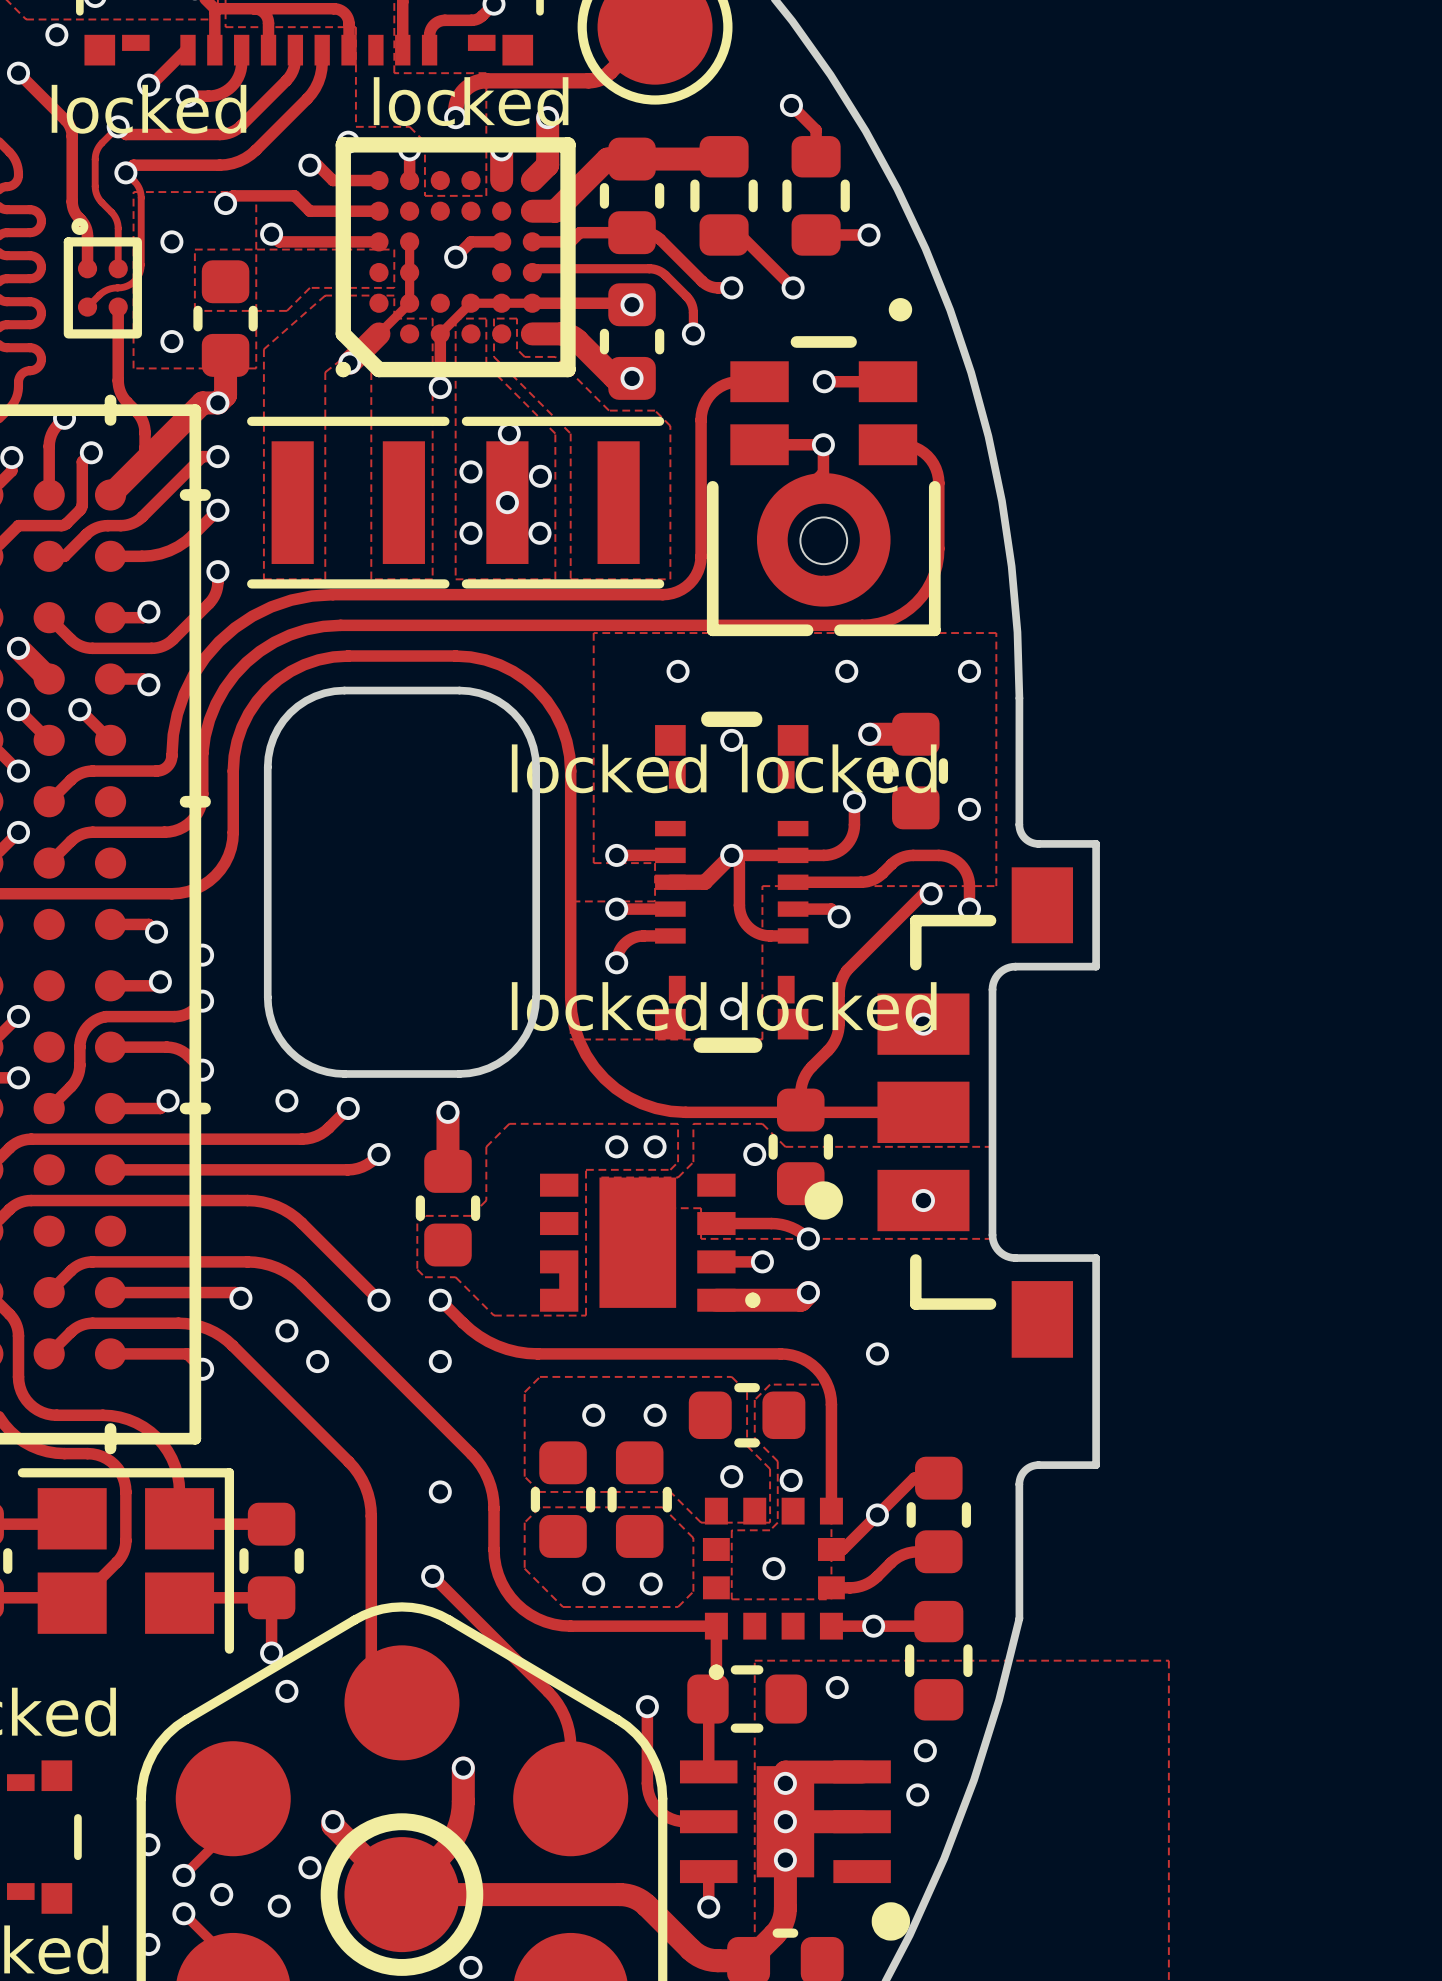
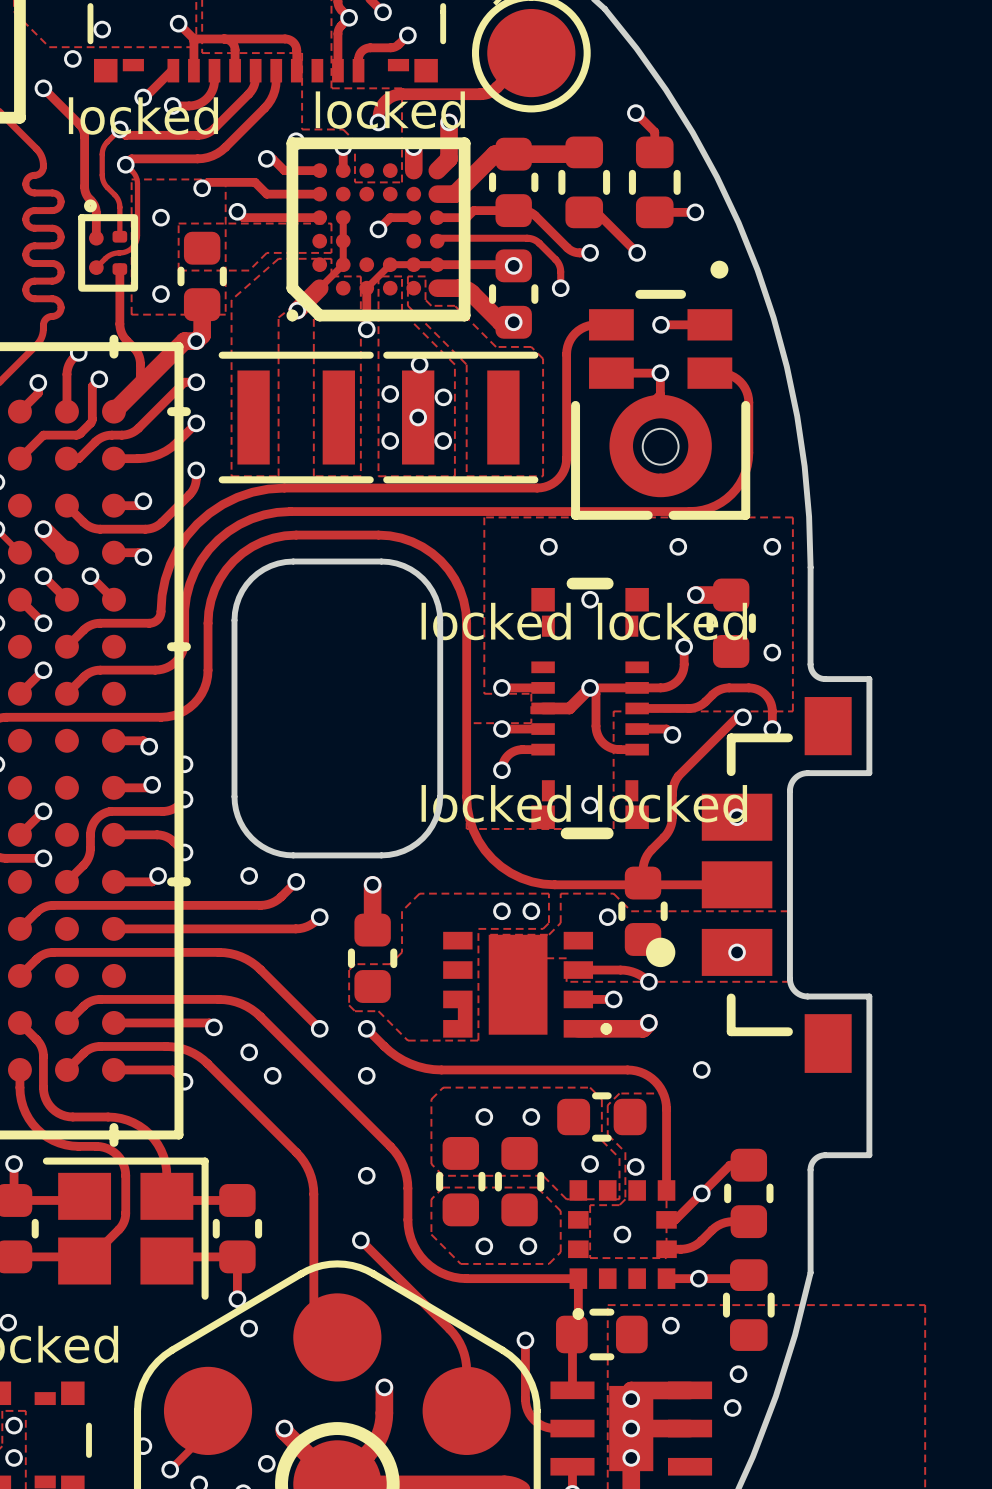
part footprint: [63, 218, 142, 339] -> [78, 199, 139, 292]

